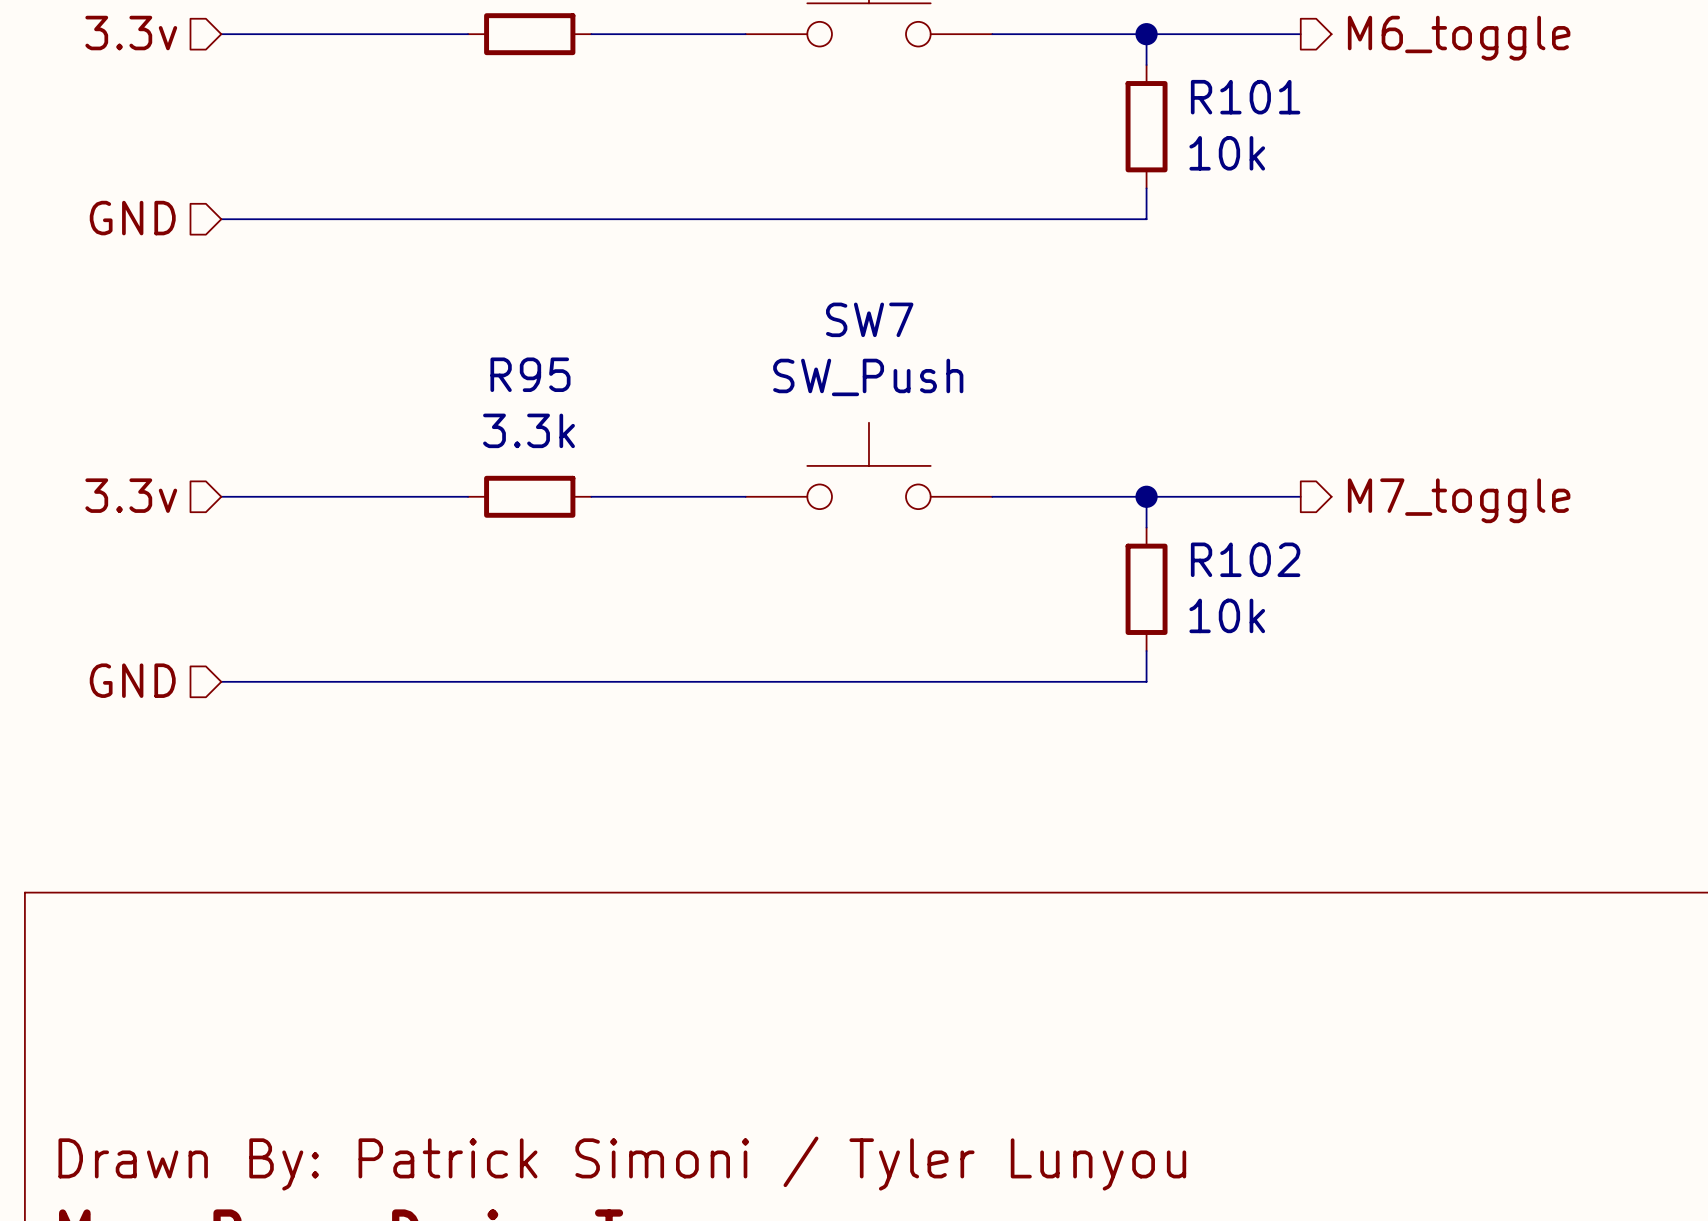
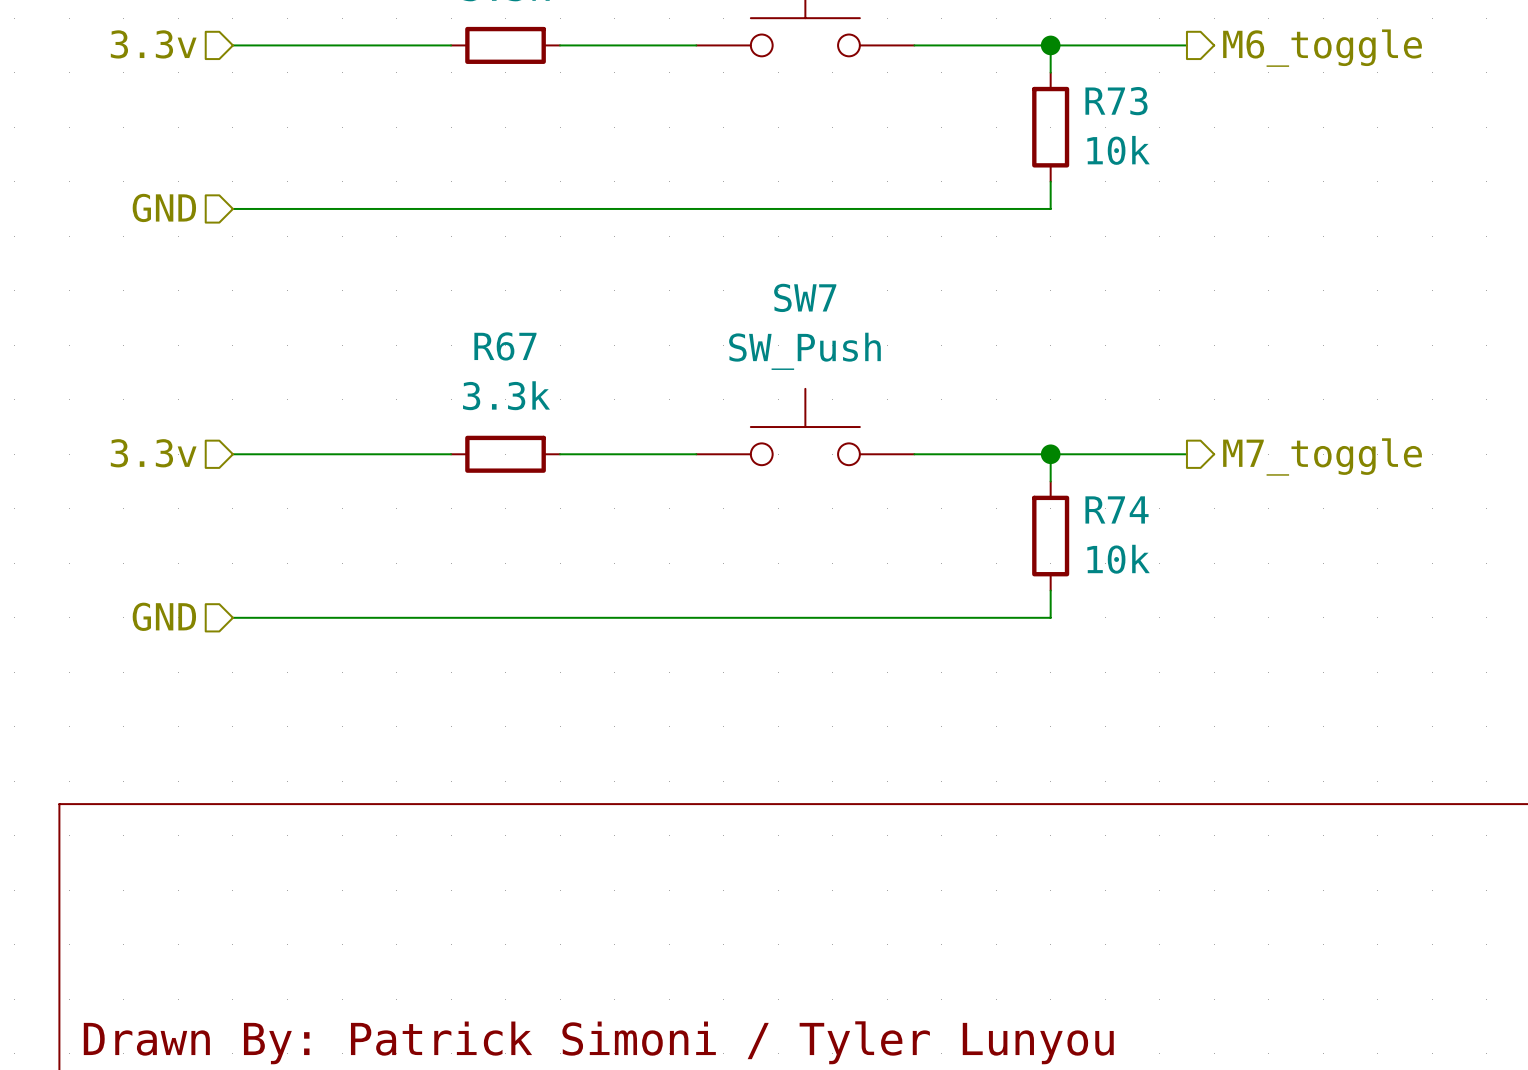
R101 name: R101 (1245, 97) -> R73 (1116, 101)
R95 name: R95 (530, 374) -> R67 (505, 346)
R102 name: R102 (1245, 559) -> R74 (1117, 509)

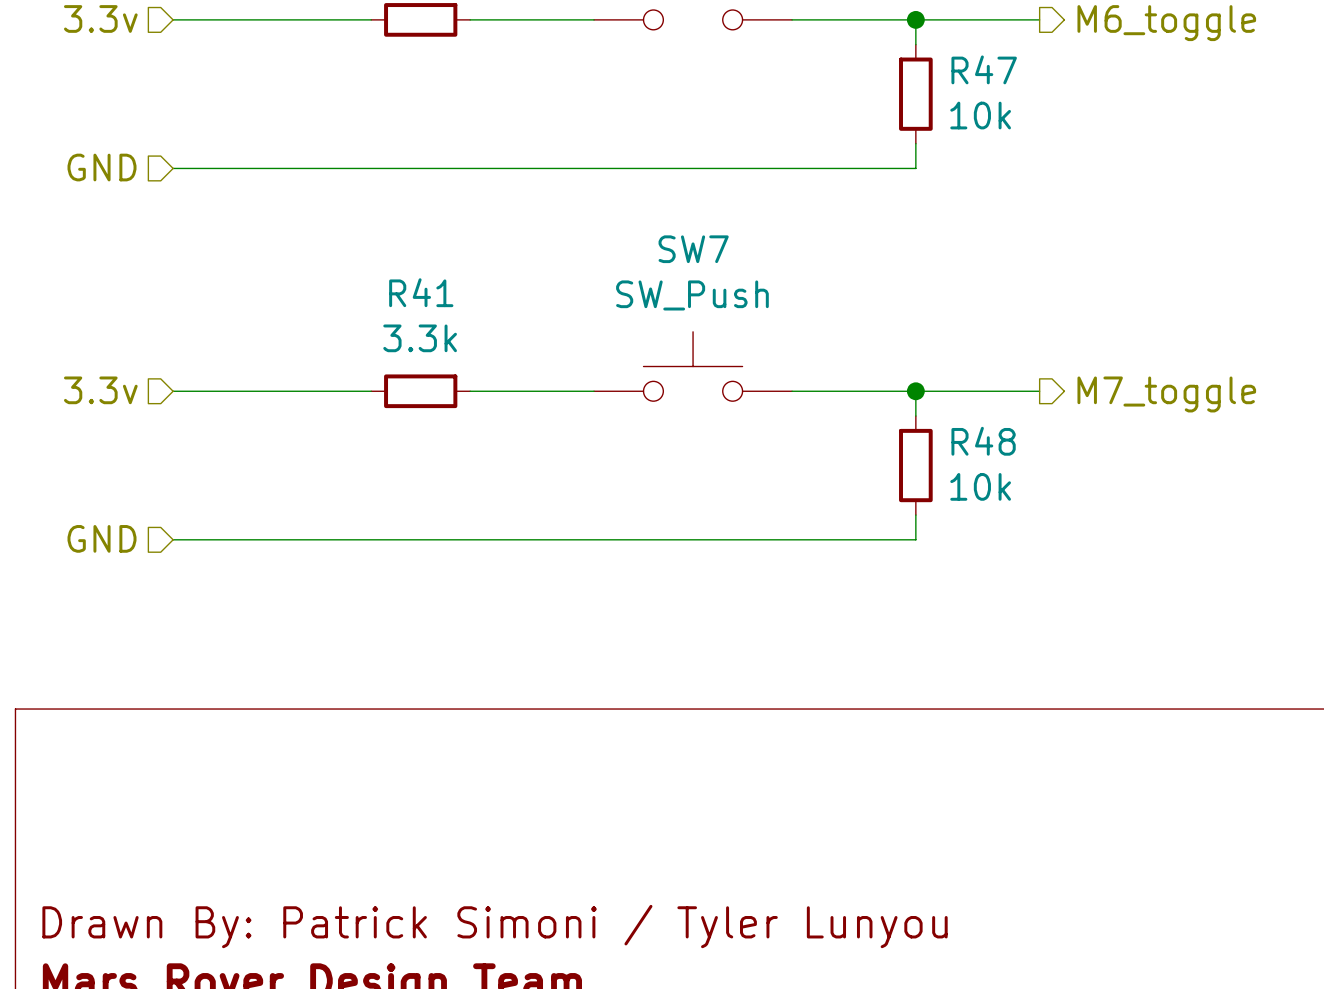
R73 name: R73 (1116, 101) -> R47 (984, 69)
R67 name: R67 (505, 346) -> R41 (421, 292)
R74 name: R74 (1117, 509) -> R48 (983, 441)

